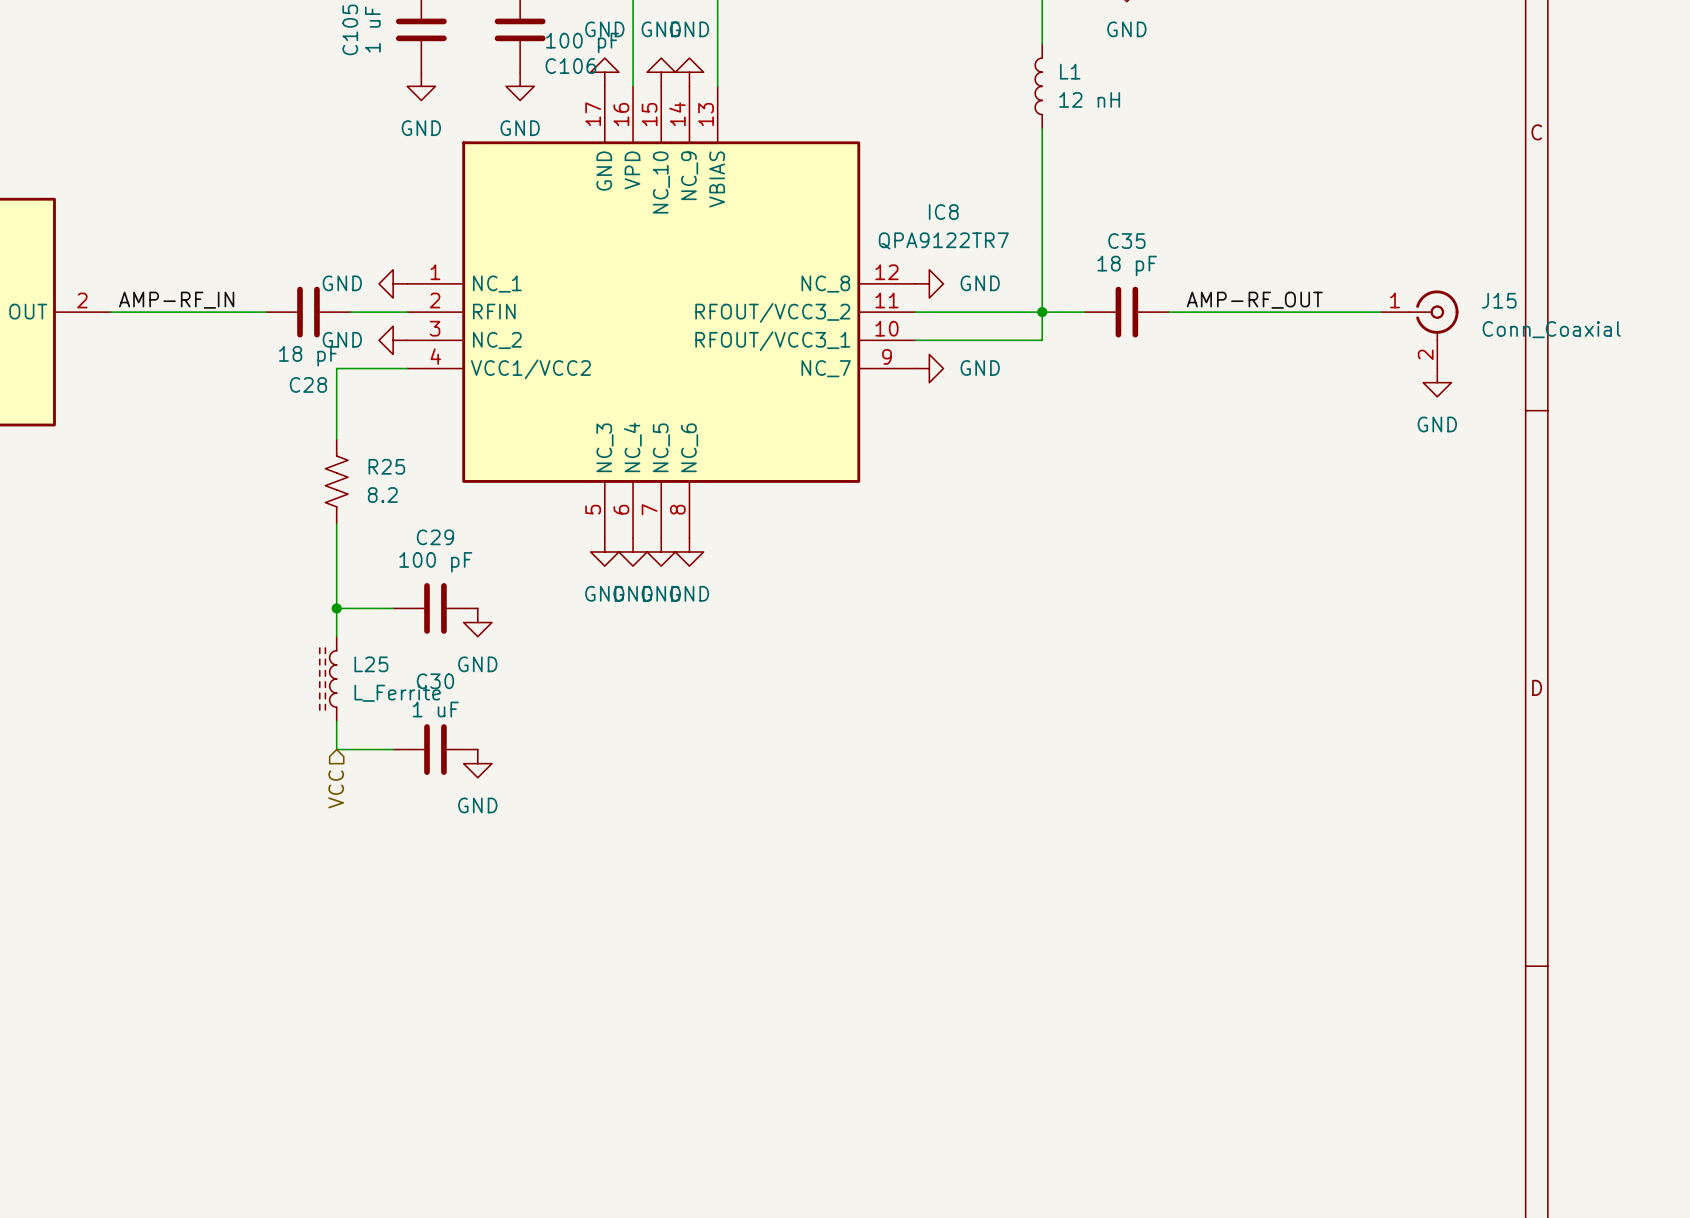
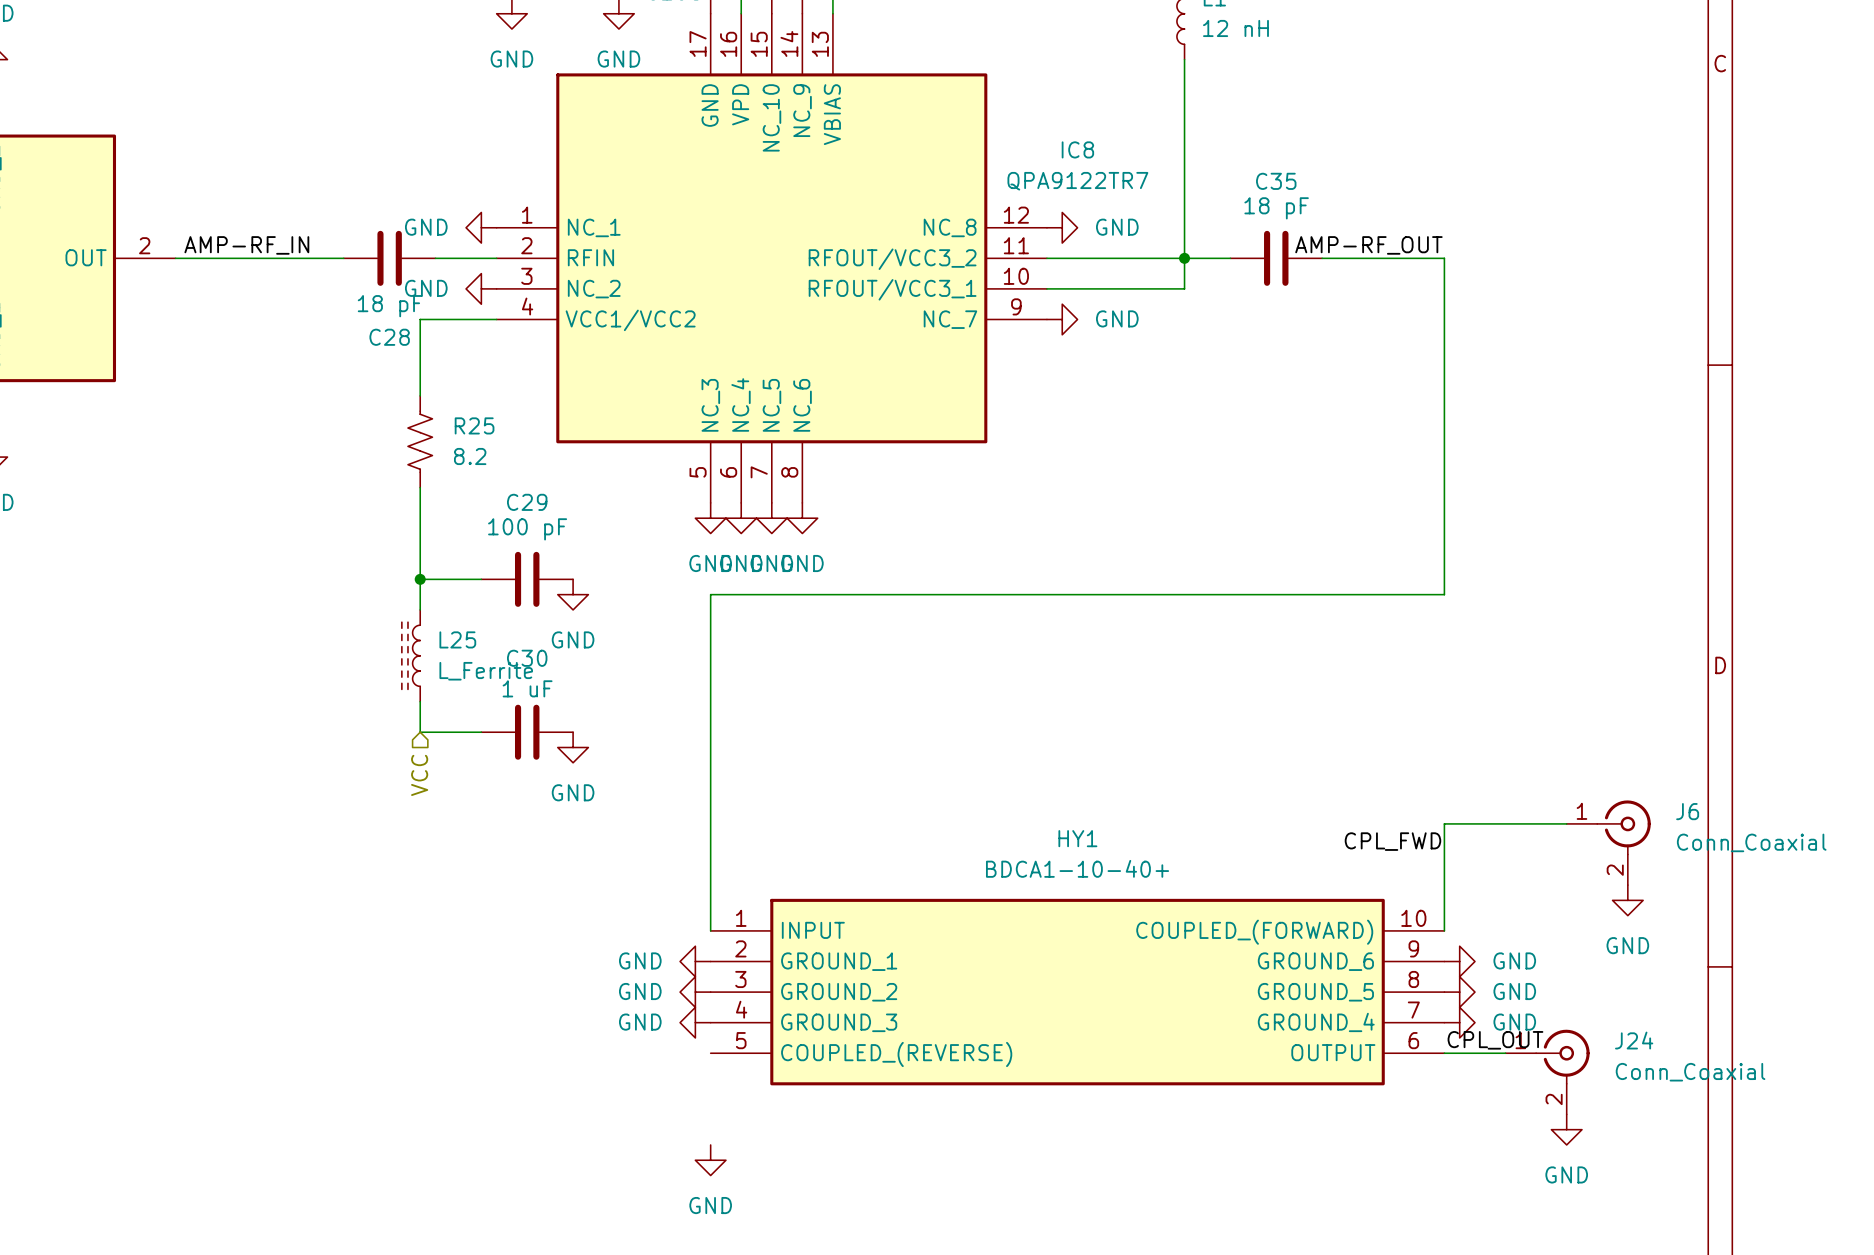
label position: AMP-RF_OUT (1254, 300) -> AMP-RF_OUT (1368, 245)
wire: (1282, 312) (1380, 312) -> (1444, 258) (1444, 594) (710, 594) (710, 930)
J15: Conn_Coaxial (1419, 329) -> none
power symbol: GND (1437, 382) -> none
wire: none -> (1566, 823) (1444, 823) (1444, 930)
label: none -> CPL_FWD (1392, 841)
J6: none -> Conn_Coaxial (1608, 842)
power symbol: none -> GND (1627, 900)
power symbol: none -> GND (695, 961)
power symbol: none -> GND (1459, 961)
power symbol: none -> GND (695, 992)
HY1: none -> BDCA1-10-40+ (1077, 992)
power symbol: none -> GND (1459, 992)
power symbol: none -> GND (695, 1022)
power symbol: none -> GND (1459, 1022)
label: none -> CPL_OUT (1495, 1040)
wire: none -> (1444, 1053) (1505, 1053)
J24: none -> Conn_Coaxial (1547, 1072)
power symbol: none -> GND (1566, 1129)
power symbol: none -> GND (710, 1160)

